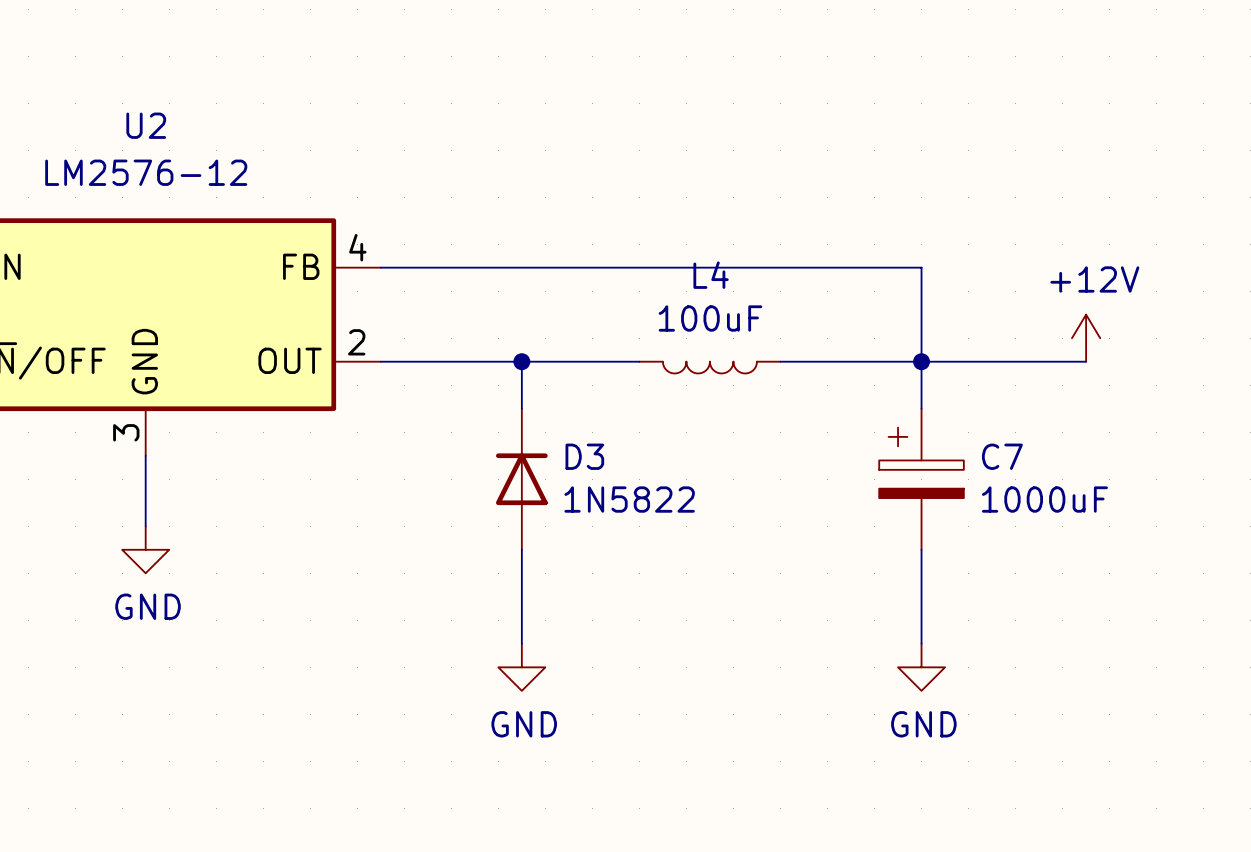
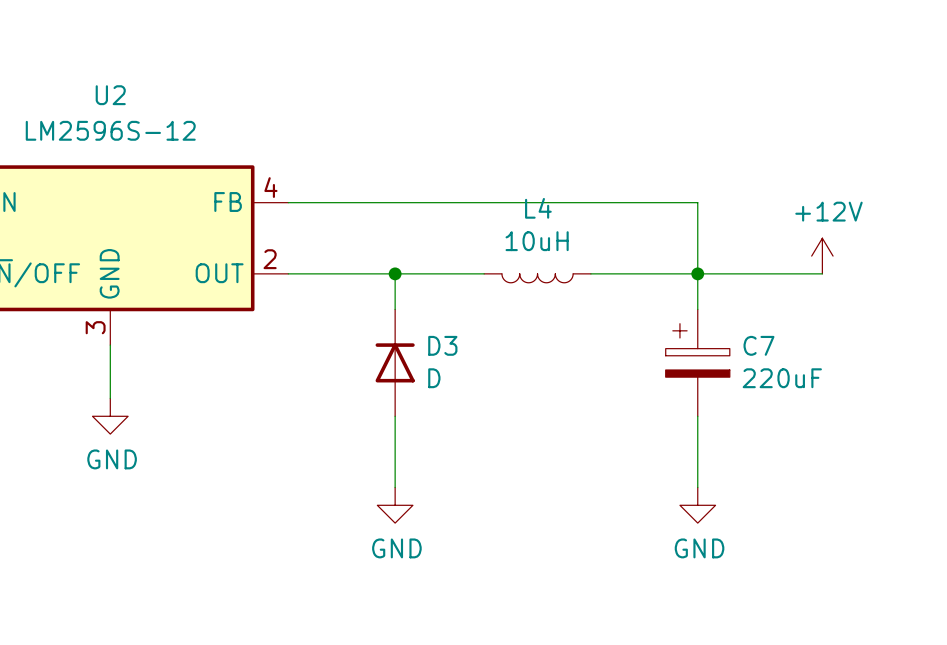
U2 value: LM2576-12 (146, 172) -> LM2596S-12 (110, 130)
L4 value: 100uF (710, 318) -> 10uH (537, 241)
D3 value: 1N5822 (629, 499) -> D (434, 378)
C7 value: 1000uF (1044, 499) -> 220uF (782, 378)

